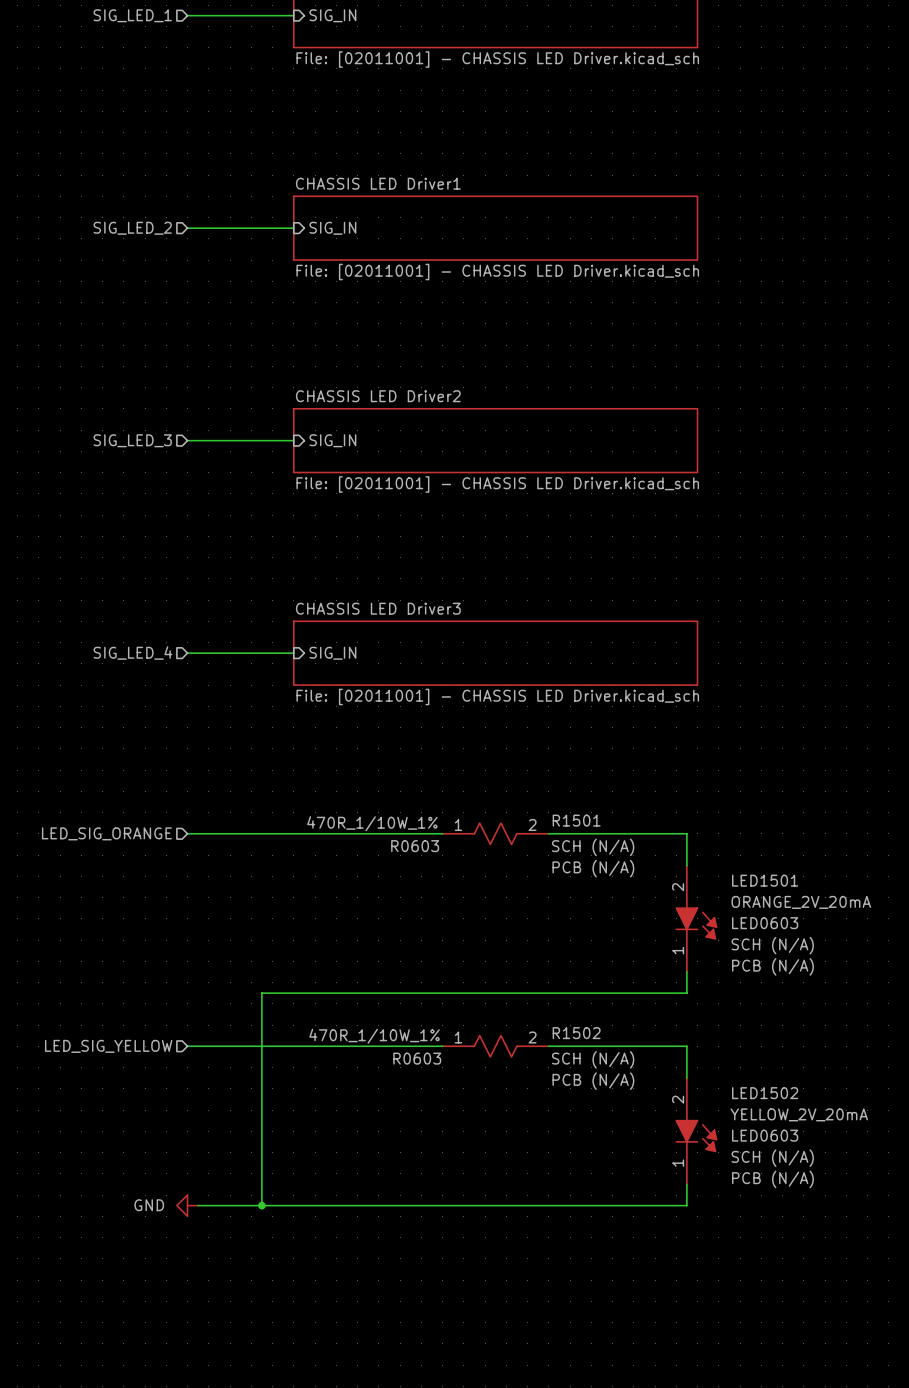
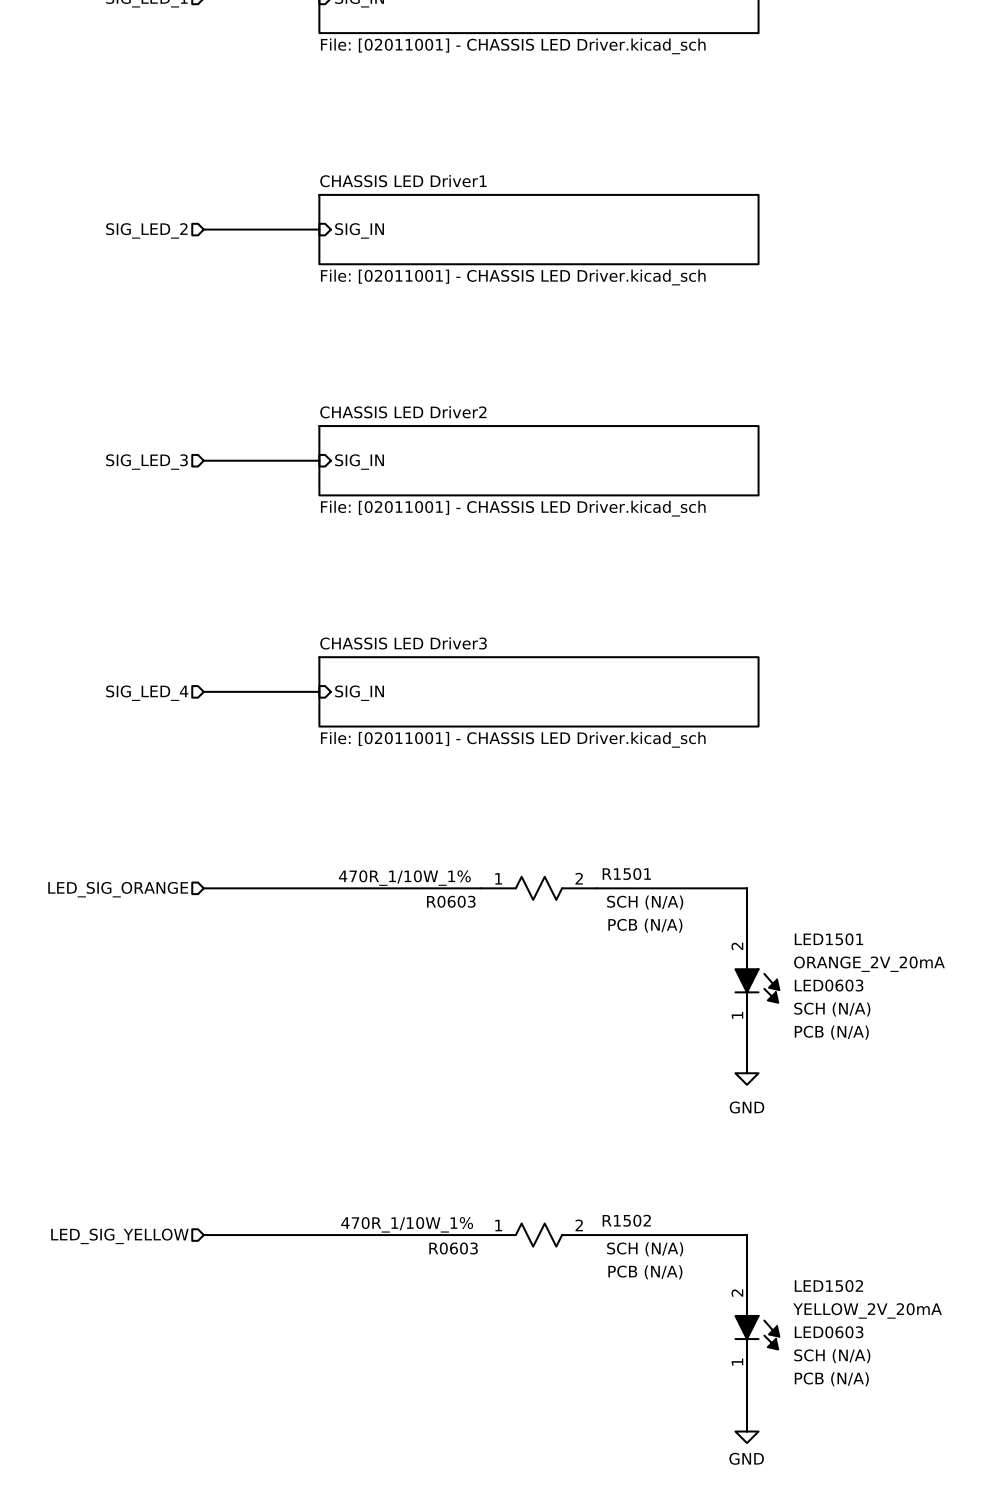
wire: (686, 993) (261, 993) (261, 1205) -> none
power symbol: none -> GND (747, 1073)
hierarchical label position: LED_SIG_YELLOW (108, 1046) -> LED_SIG_YELLOW (119, 1236)
wire: (187, 1046) (442, 1046) -> (203, 1235) (481, 1235)
R1502 position: (495, 1046) -> (538, 1235)
wire: (548, 1046) (686, 1046) (686, 1078) -> none
LED1502 position: (696, 1131) -> (757, 1327)
wire: (686, 1184) (686, 1205) (198, 1205) -> (747, 1269) (747, 1235) (596, 1235)
power symbol: GND (187, 1205) -> none
junction: (261, 1205) -> none
wire: none -> (747, 1385) (747, 1419)
power symbol: none -> GND (747, 1431)

